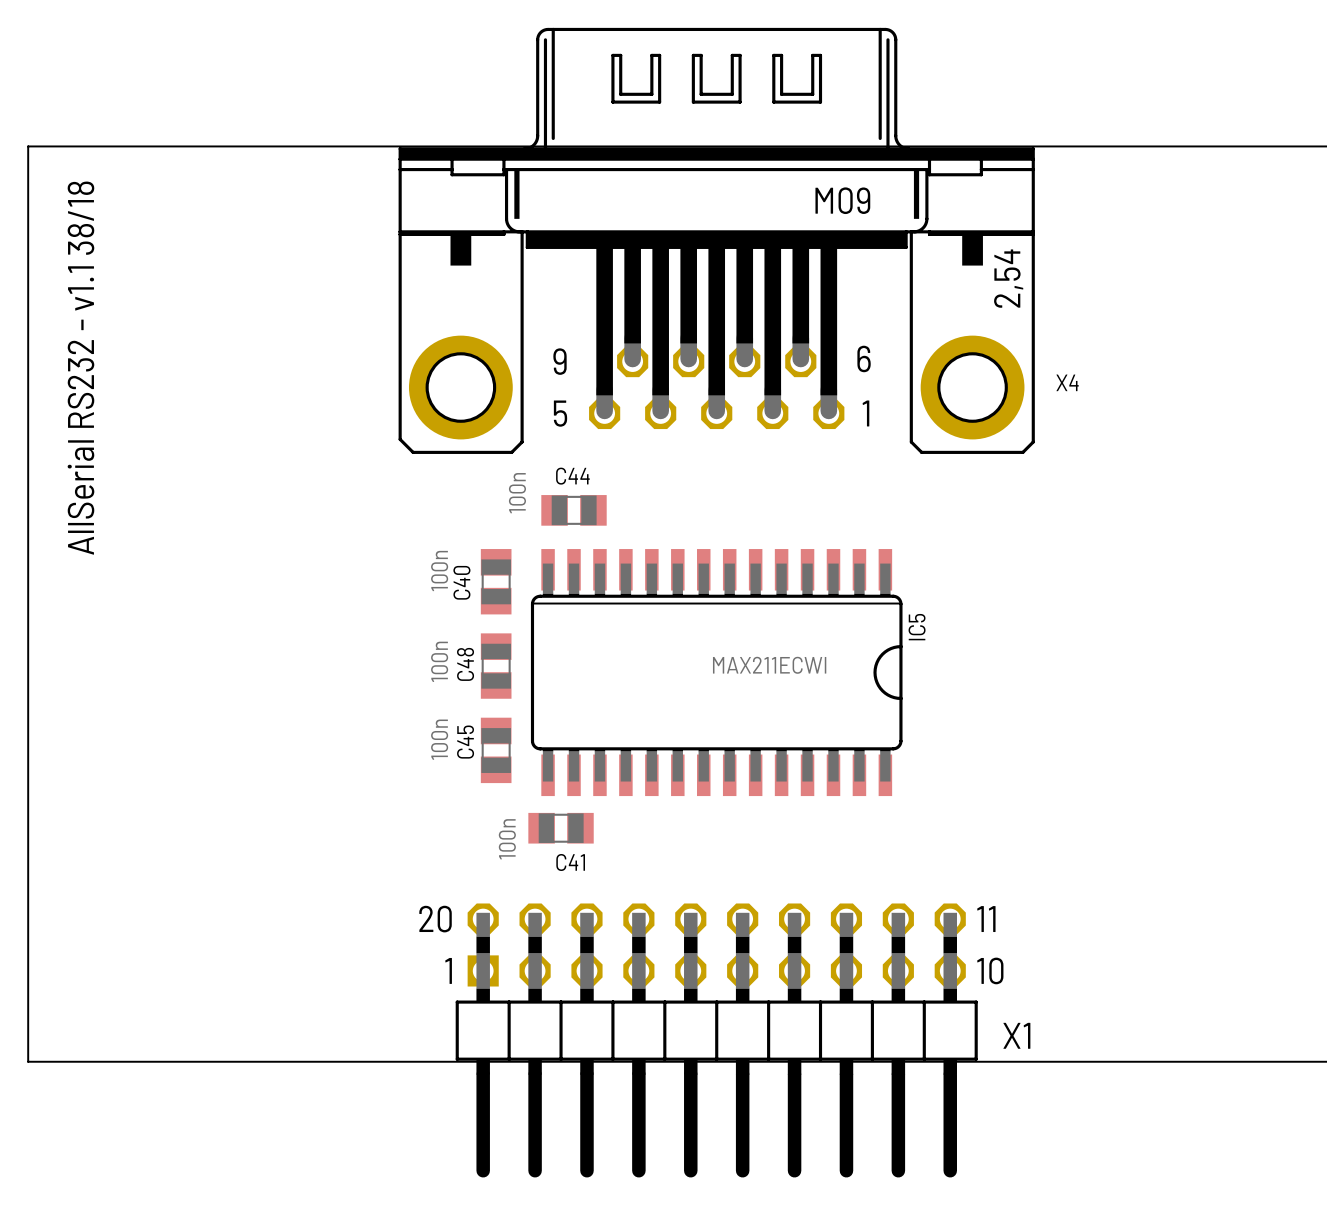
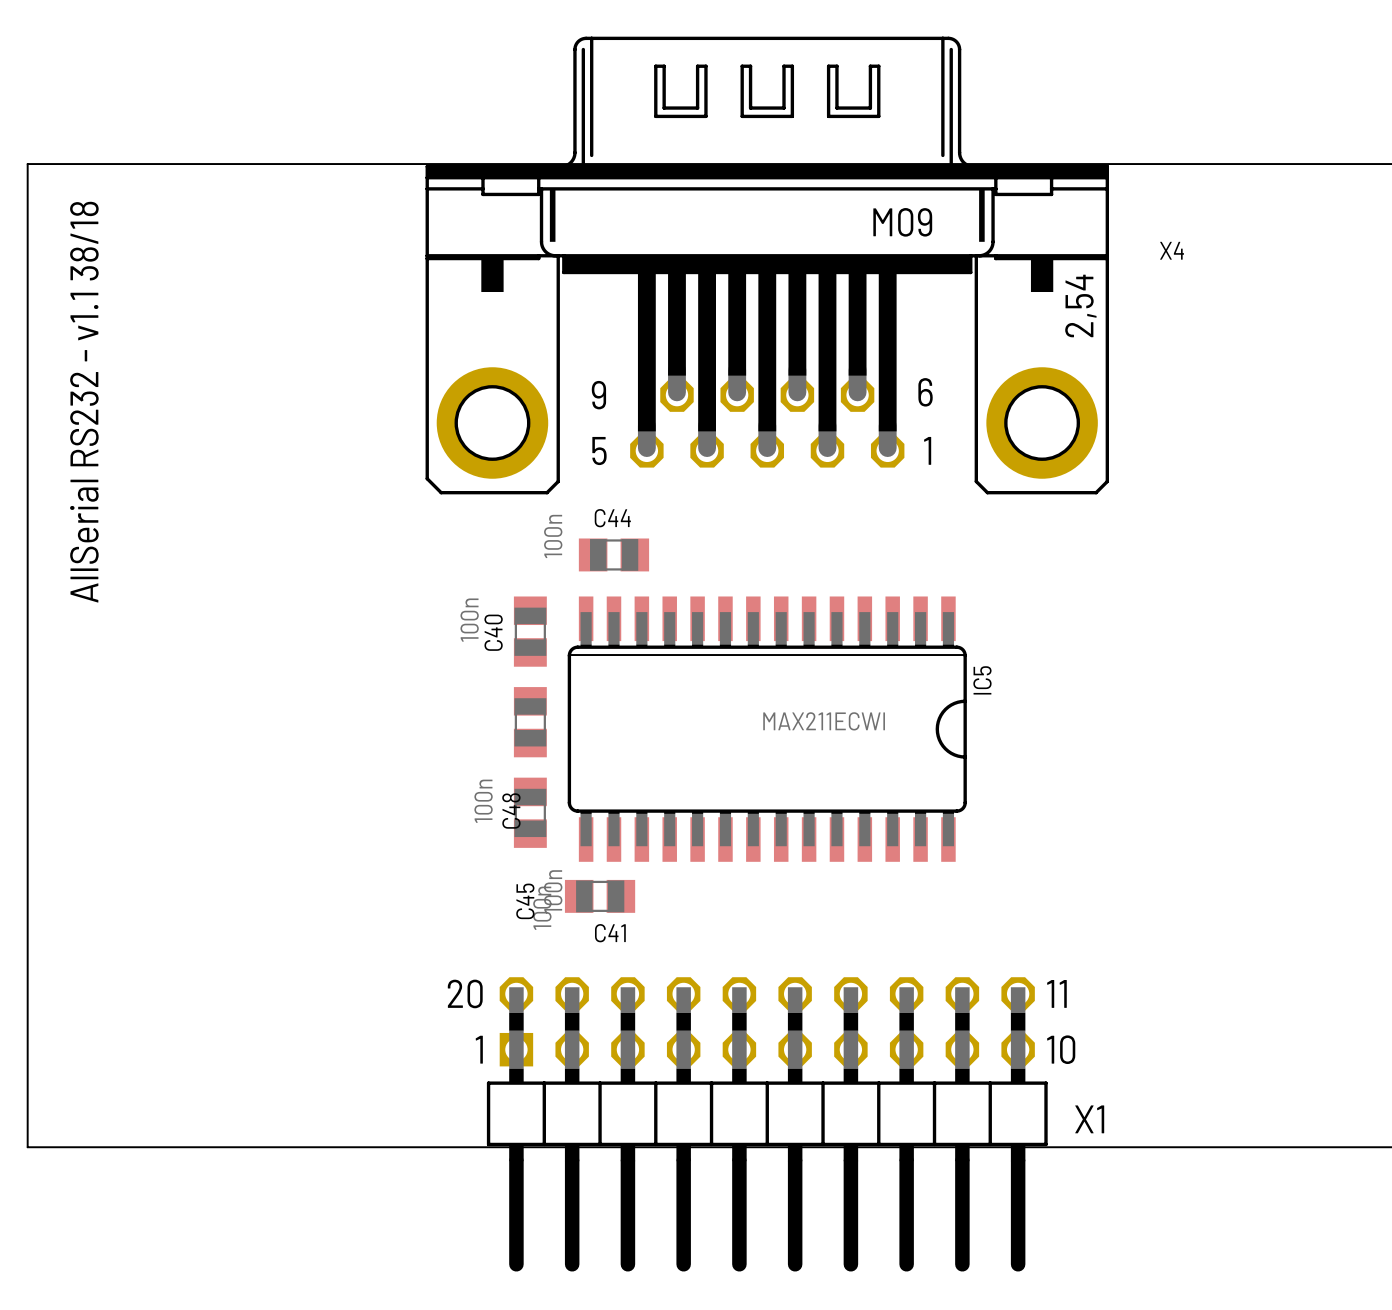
X4 name position: X4 (1067, 382) -> X4 (1172, 250)
C48 value position: 100n (439, 661) -> 100n (483, 801)
C48 name position: C48 (465, 664) -> C48 (511, 810)
C45 value position: 100n (439, 739) -> 100n (553, 891)
C45 name position: C45 (465, 742) -> C45 (525, 901)

